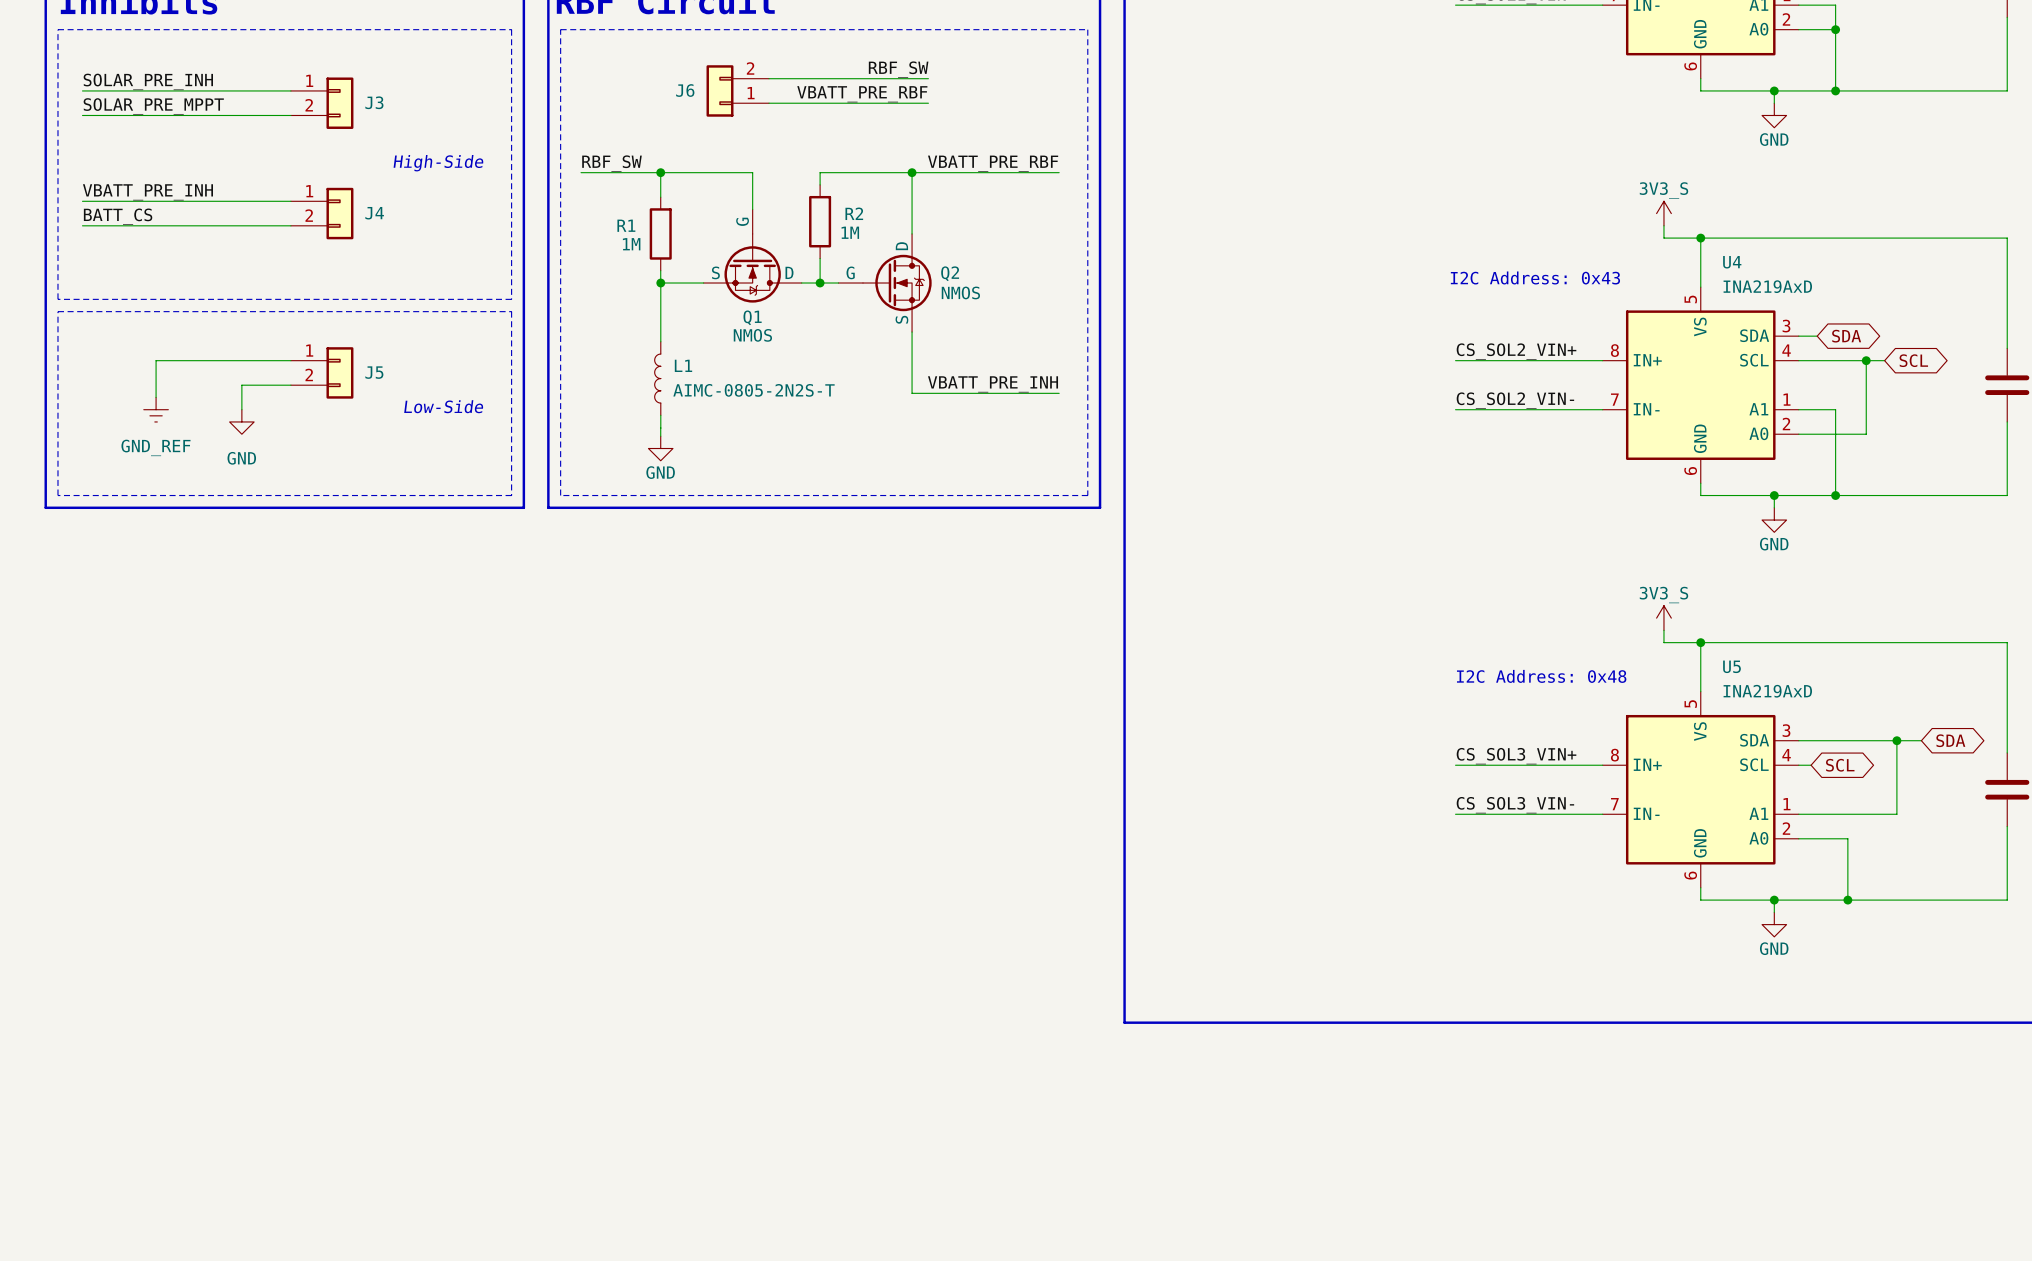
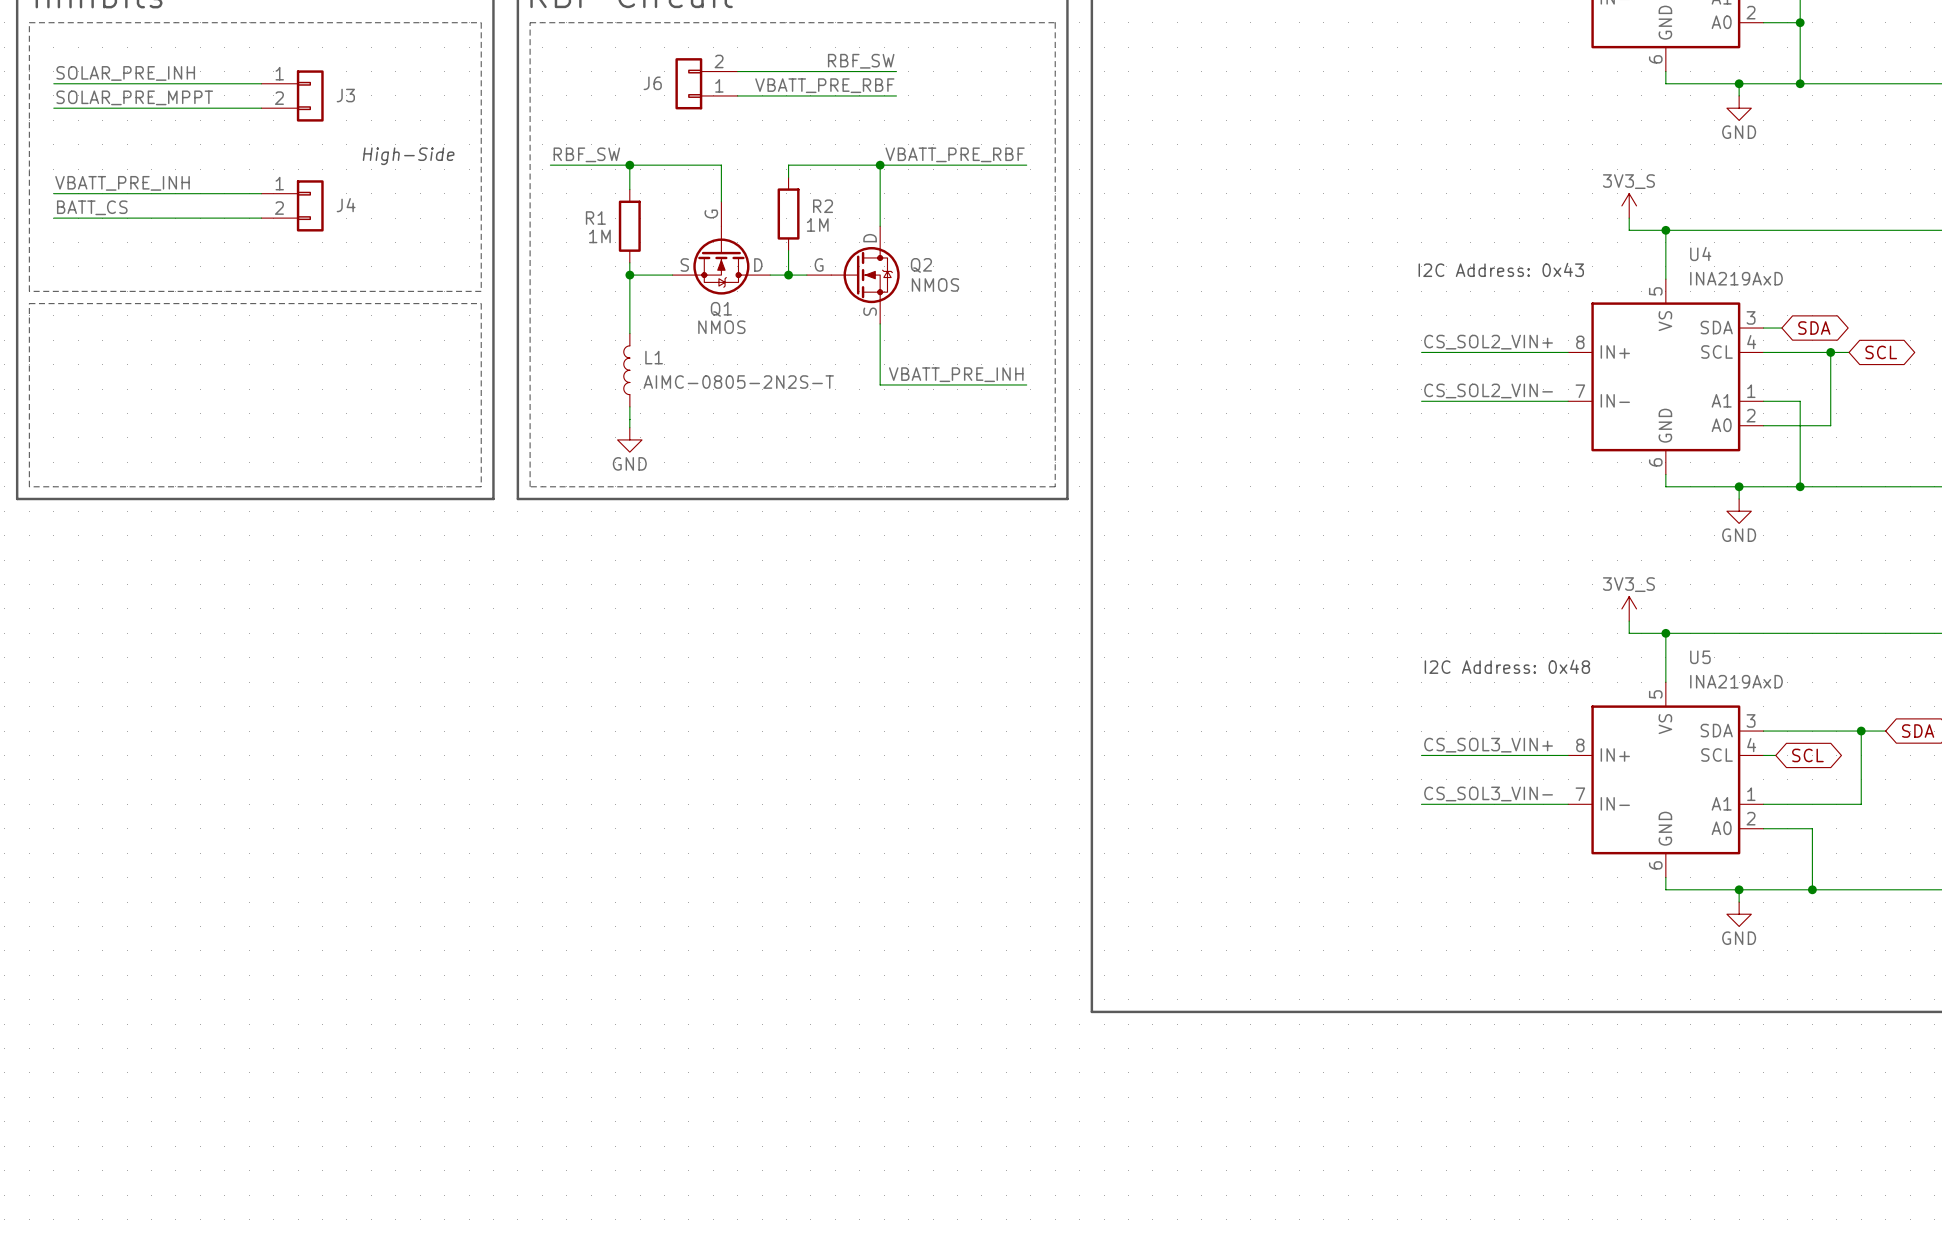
wire: (290, 360) (156, 360) (156, 397) -> none
J5: (322, 372) -> none
wire: (290, 385) (241, 385) (241, 409) -> none
text: Low-Side (443, 406) -> none
power symbol: GND_REF (156, 409) -> none
power symbol: GND (241, 421) -> none

